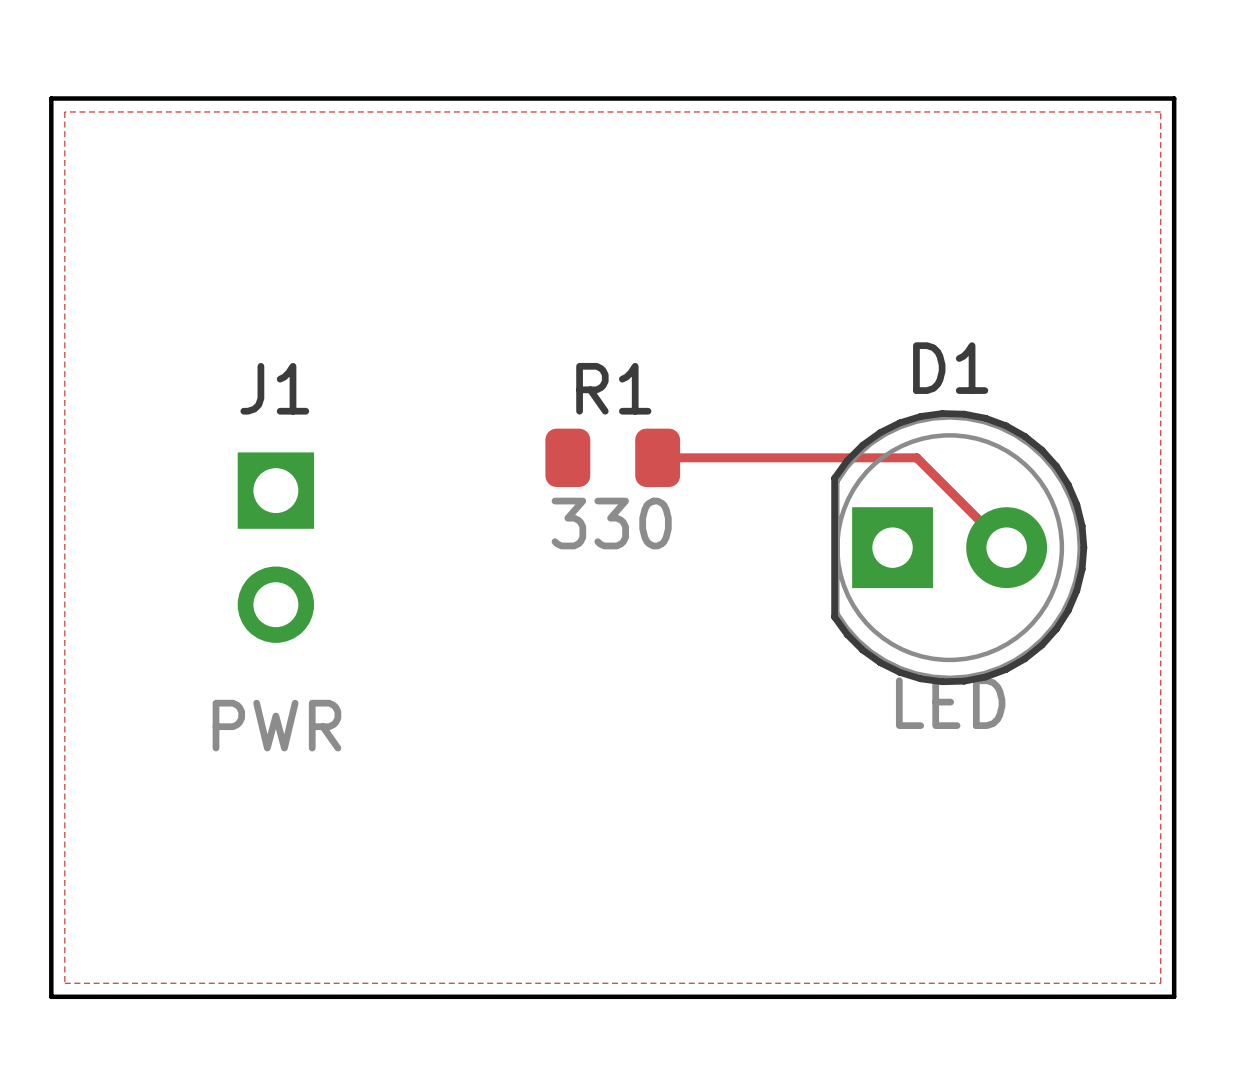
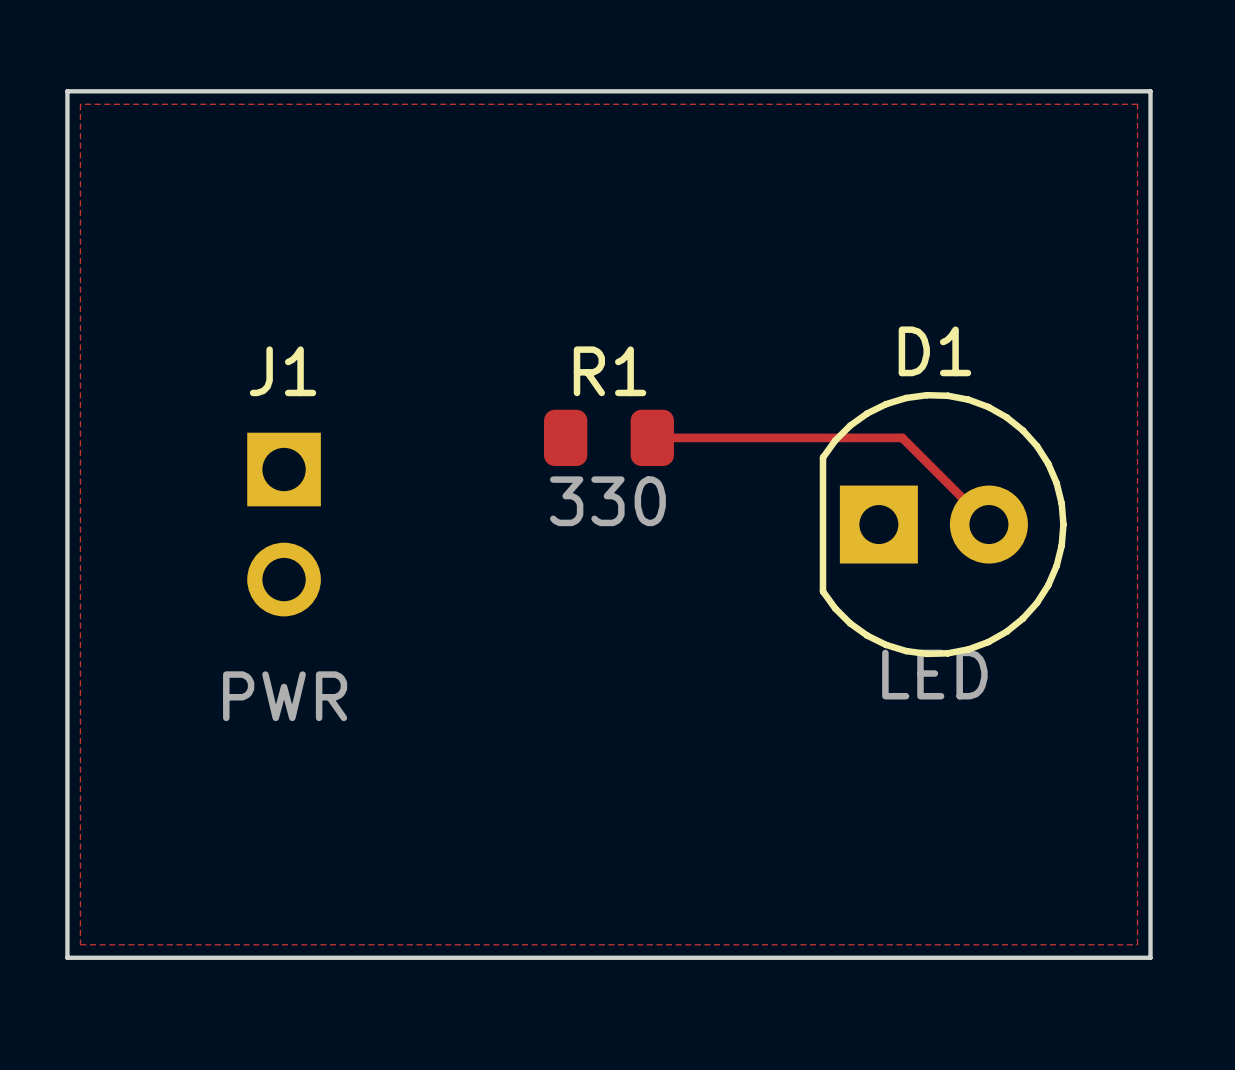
D1 footprint: [831, 410, 1088, 686] -> [819, 391, 1067, 658]

